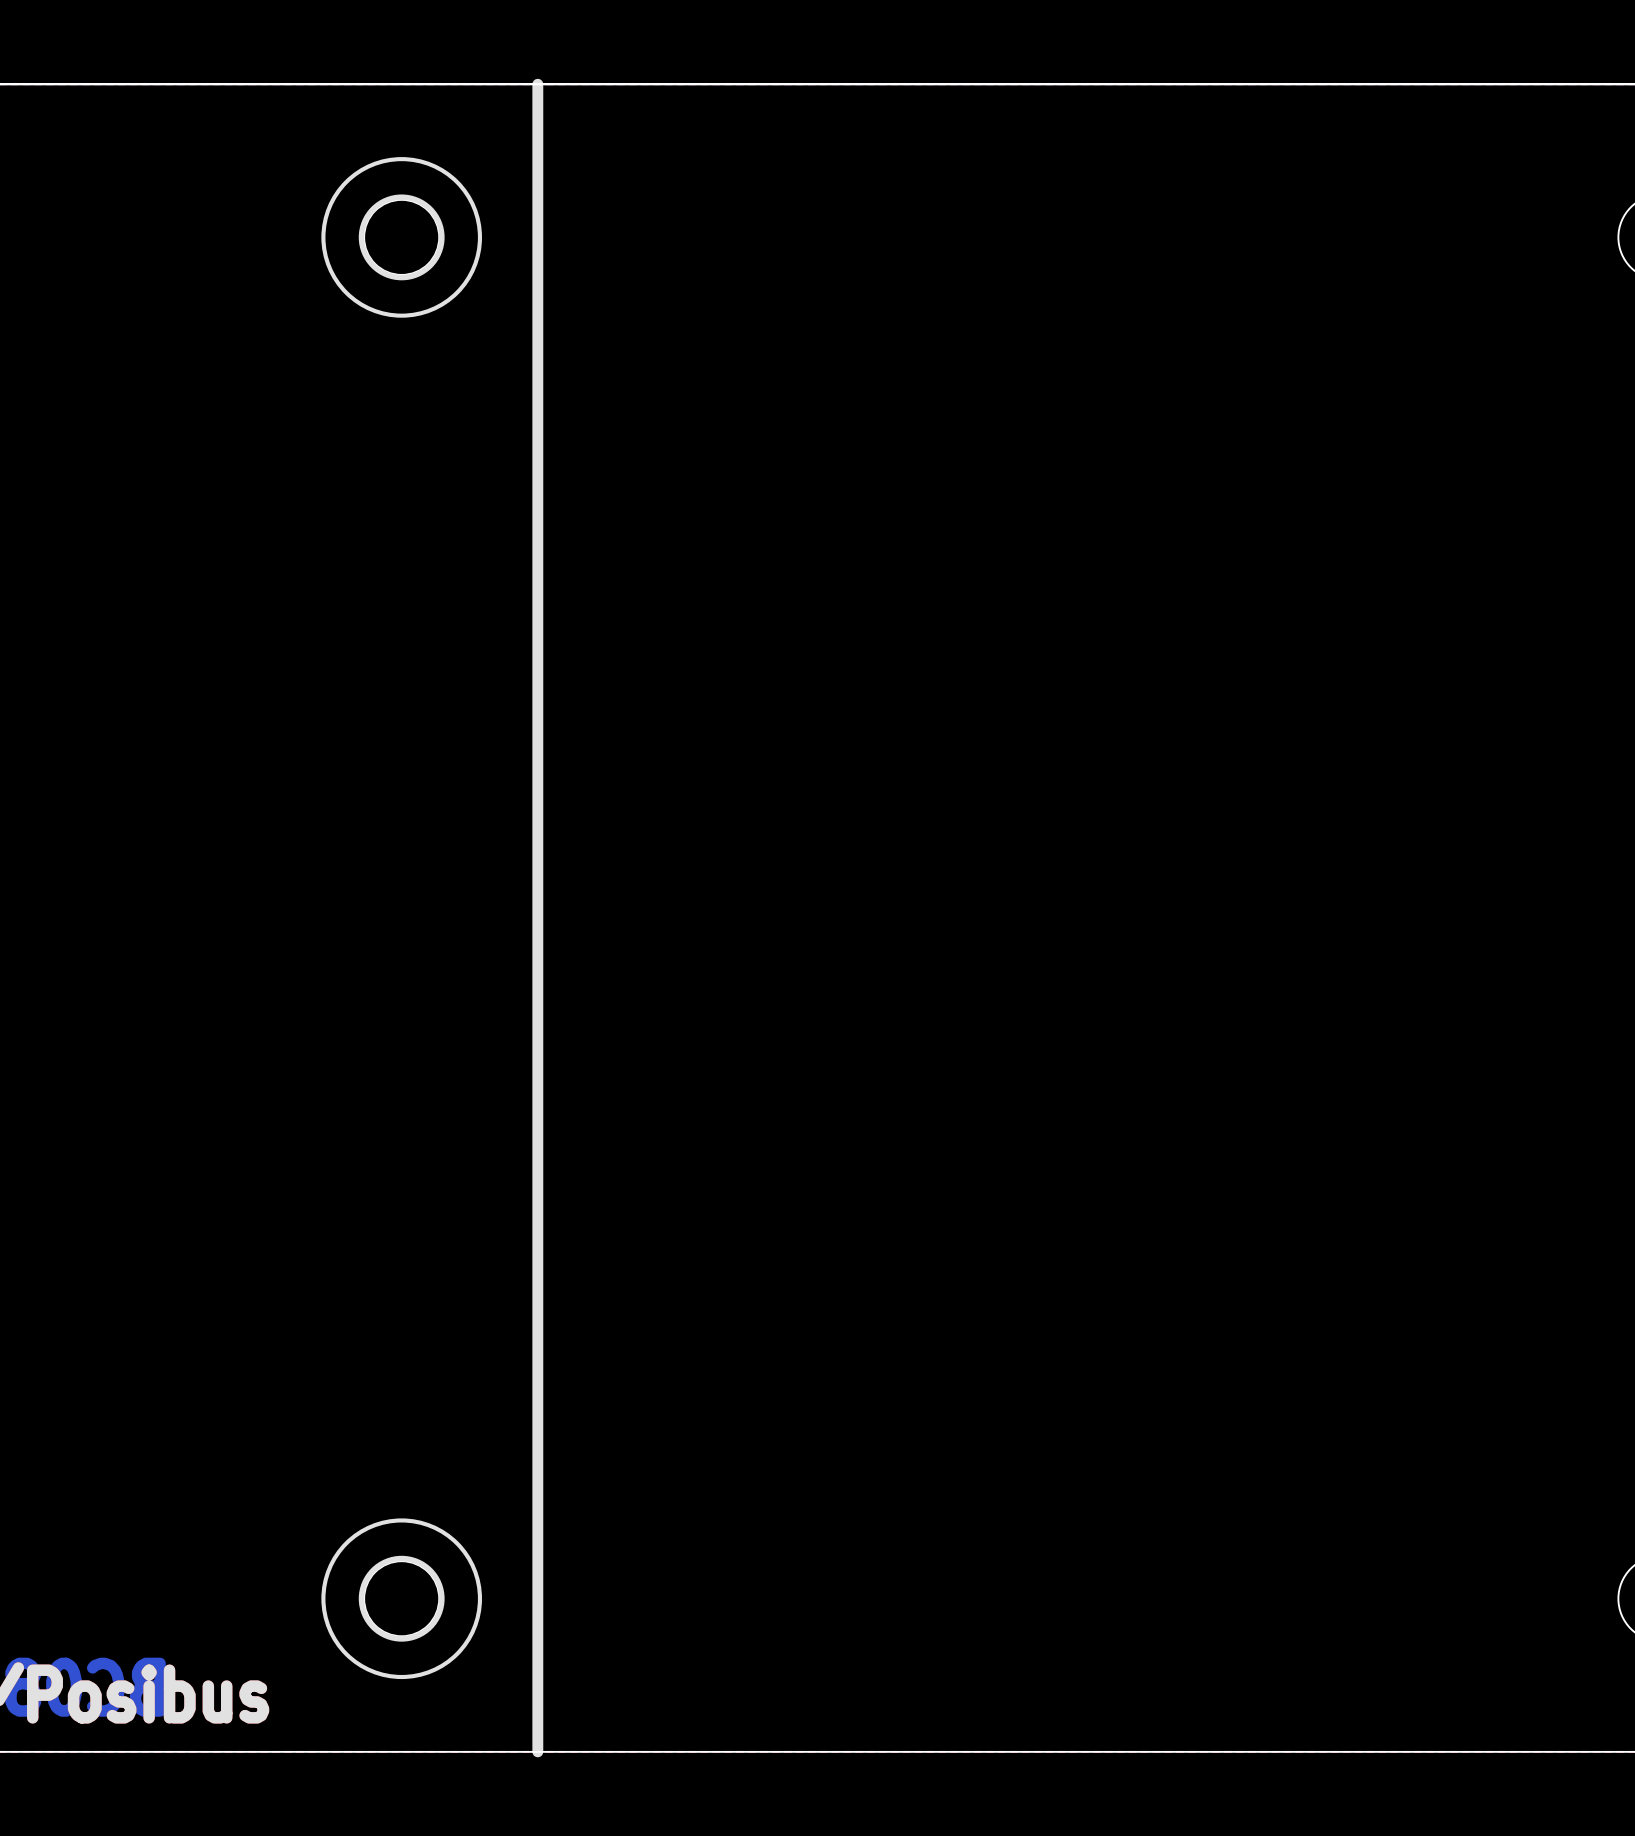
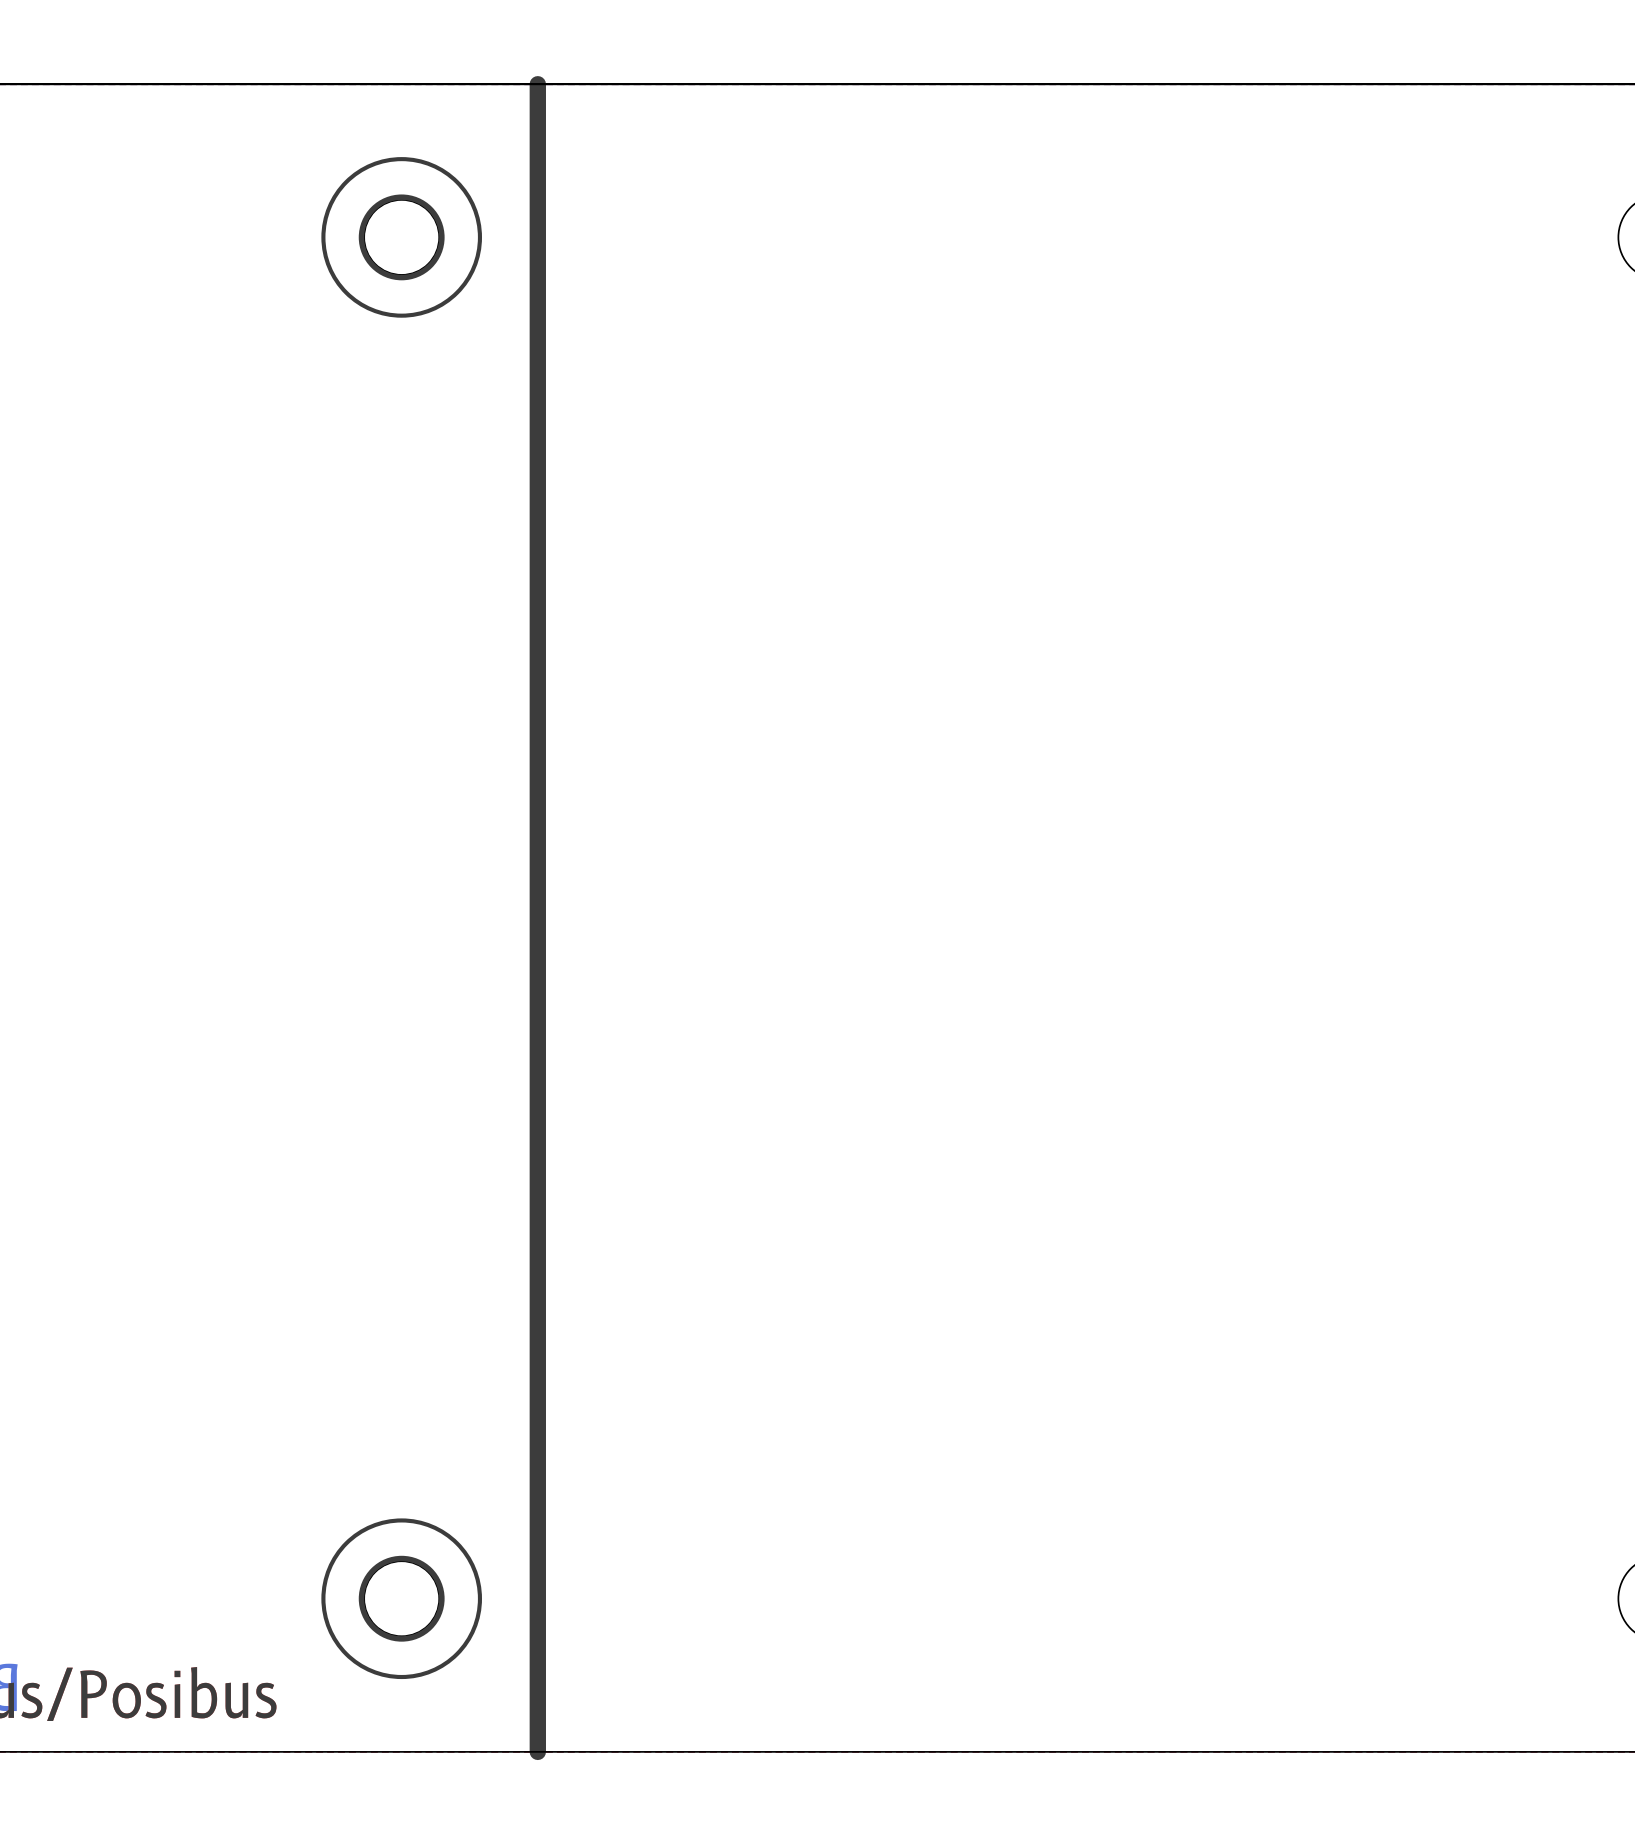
line width: thin (537, 84) (537, 1751) -> thick (537, 84) (537, 1751)

